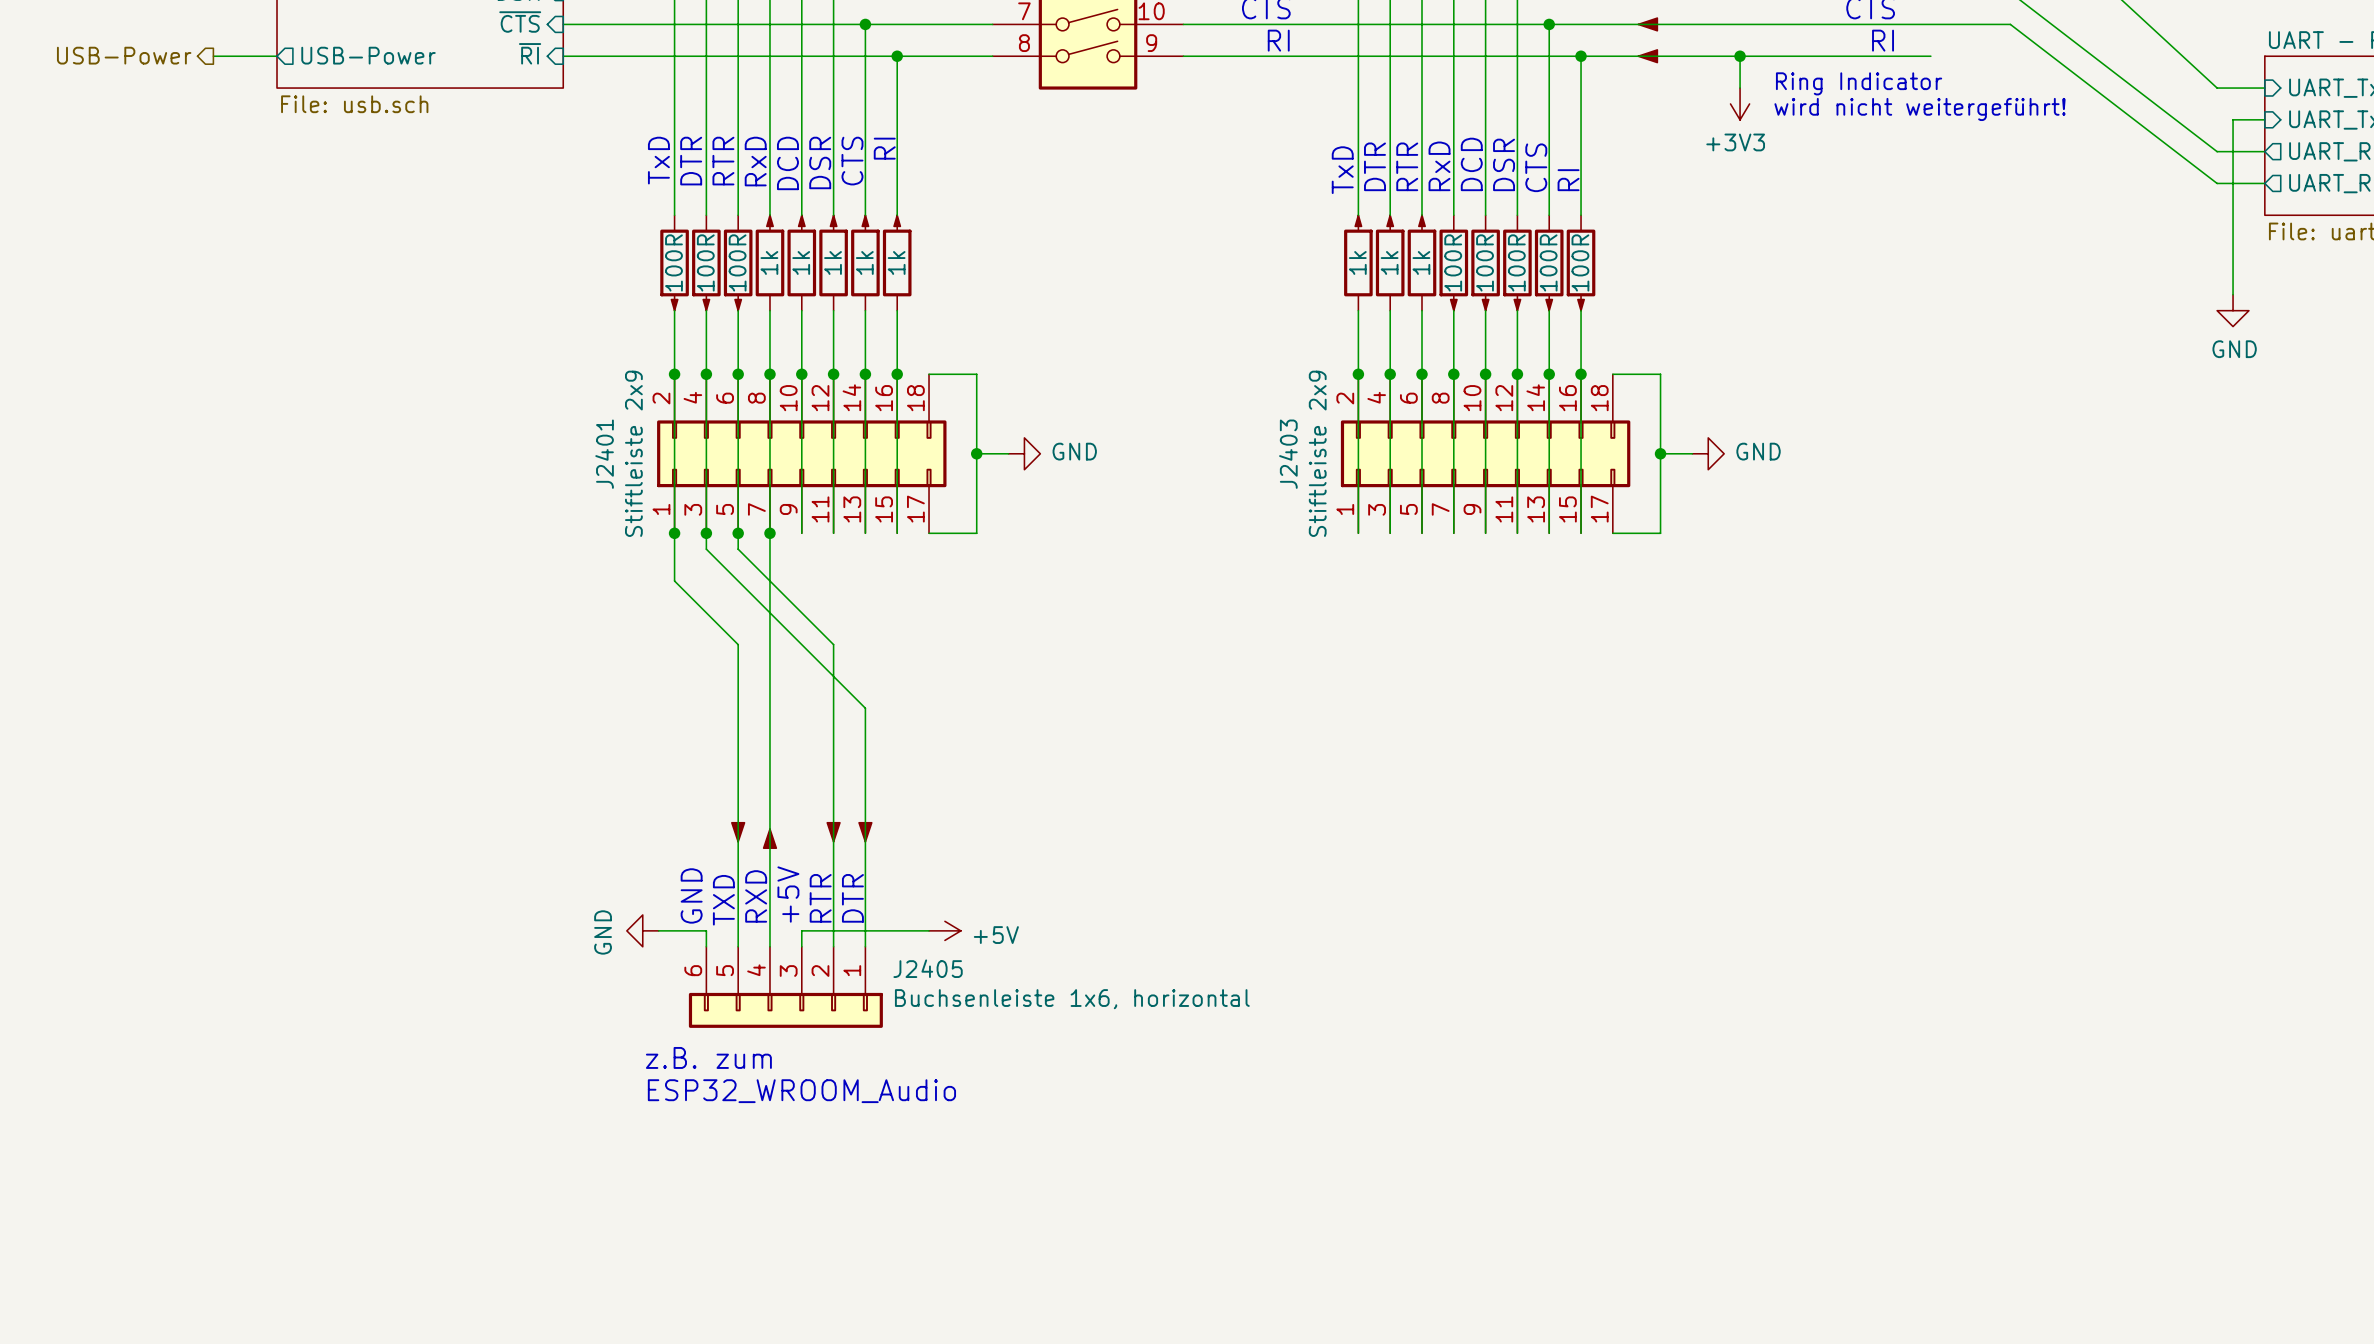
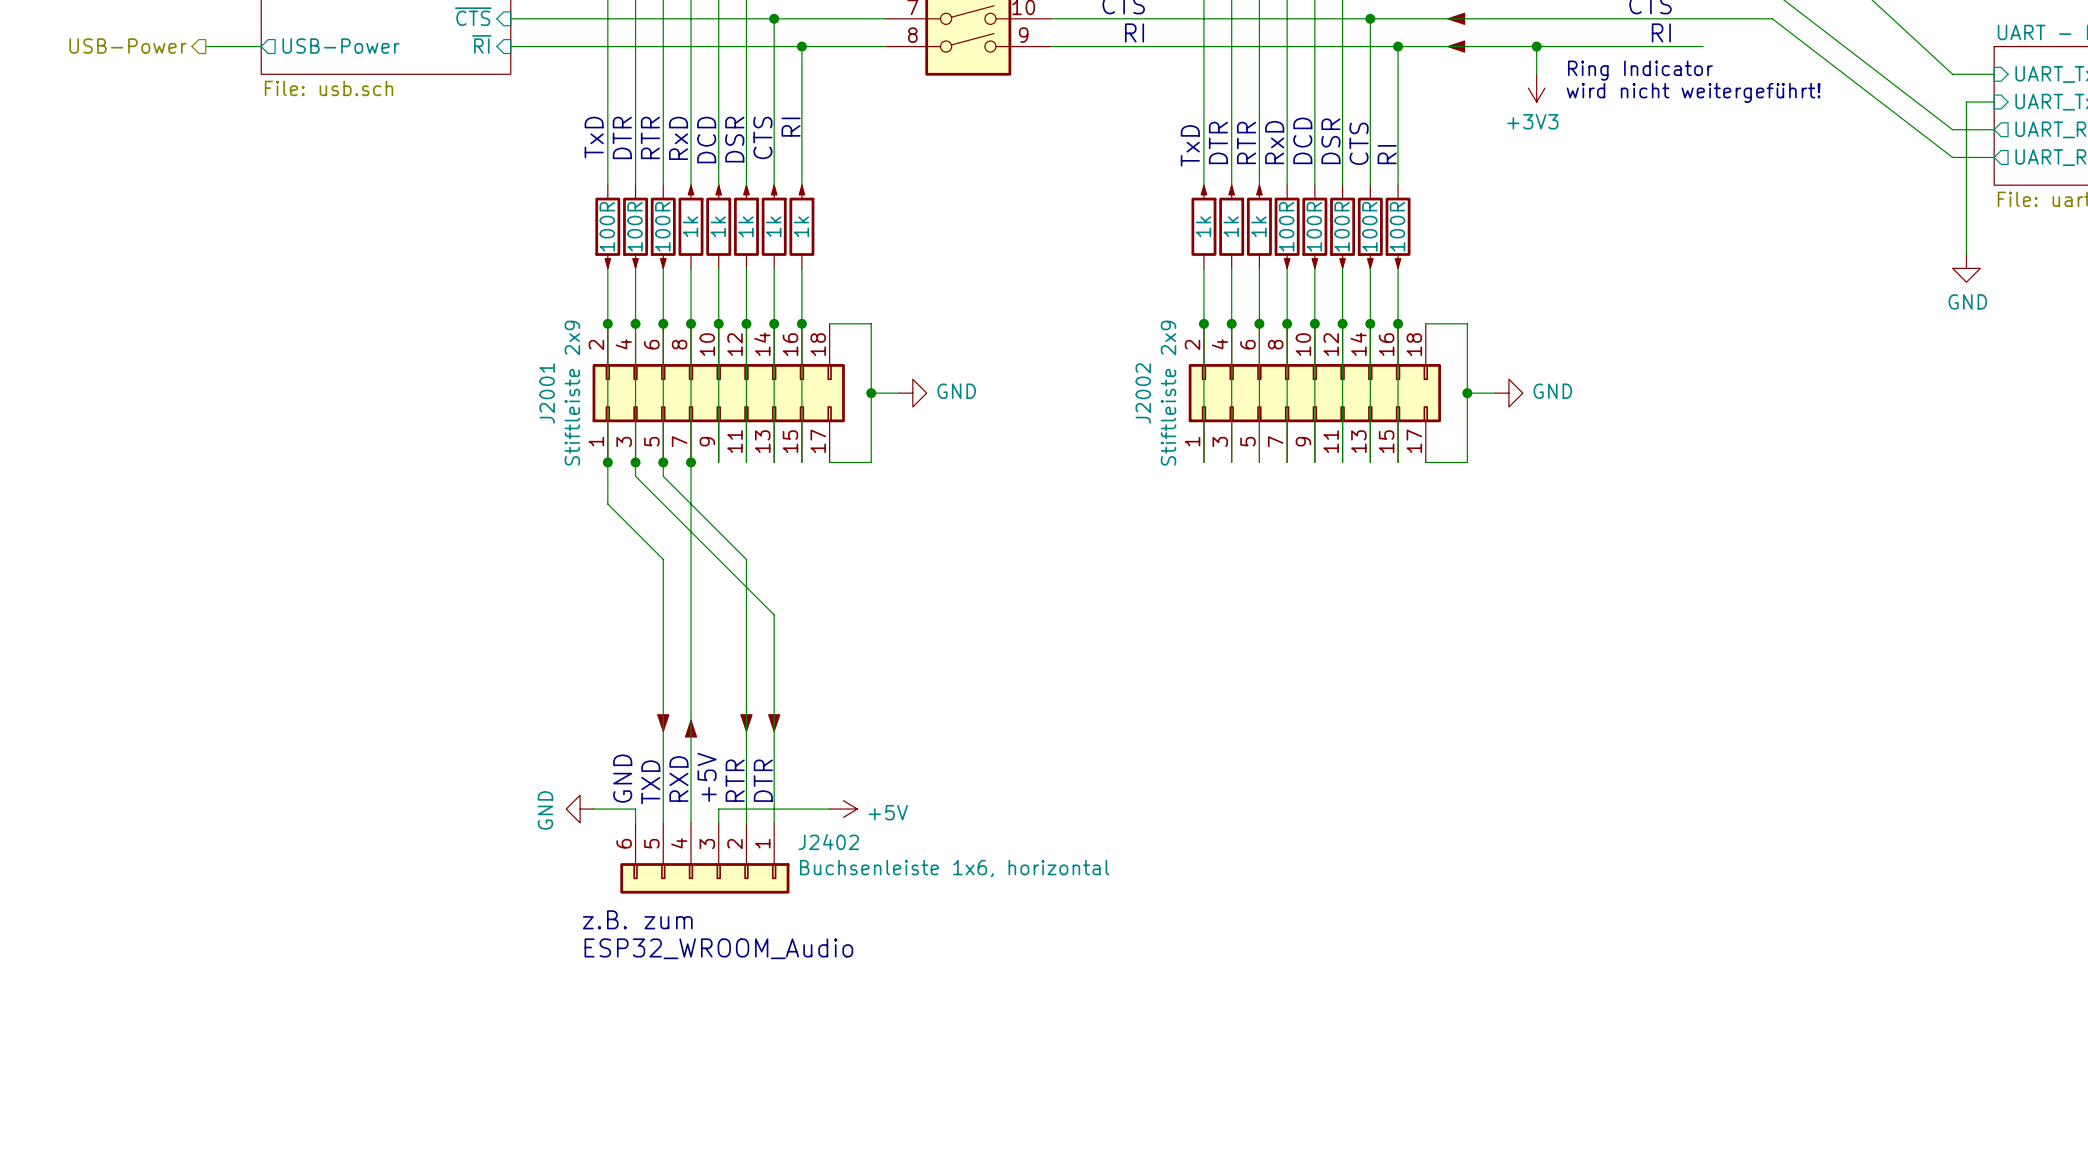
J2401 name: J2401 (604, 454) -> J2001 (547, 393)
J2403 name: J2403 (1288, 454) -> J2002 (1143, 393)
J2405 name: J2405 (928, 968) -> J2402 (828, 842)

